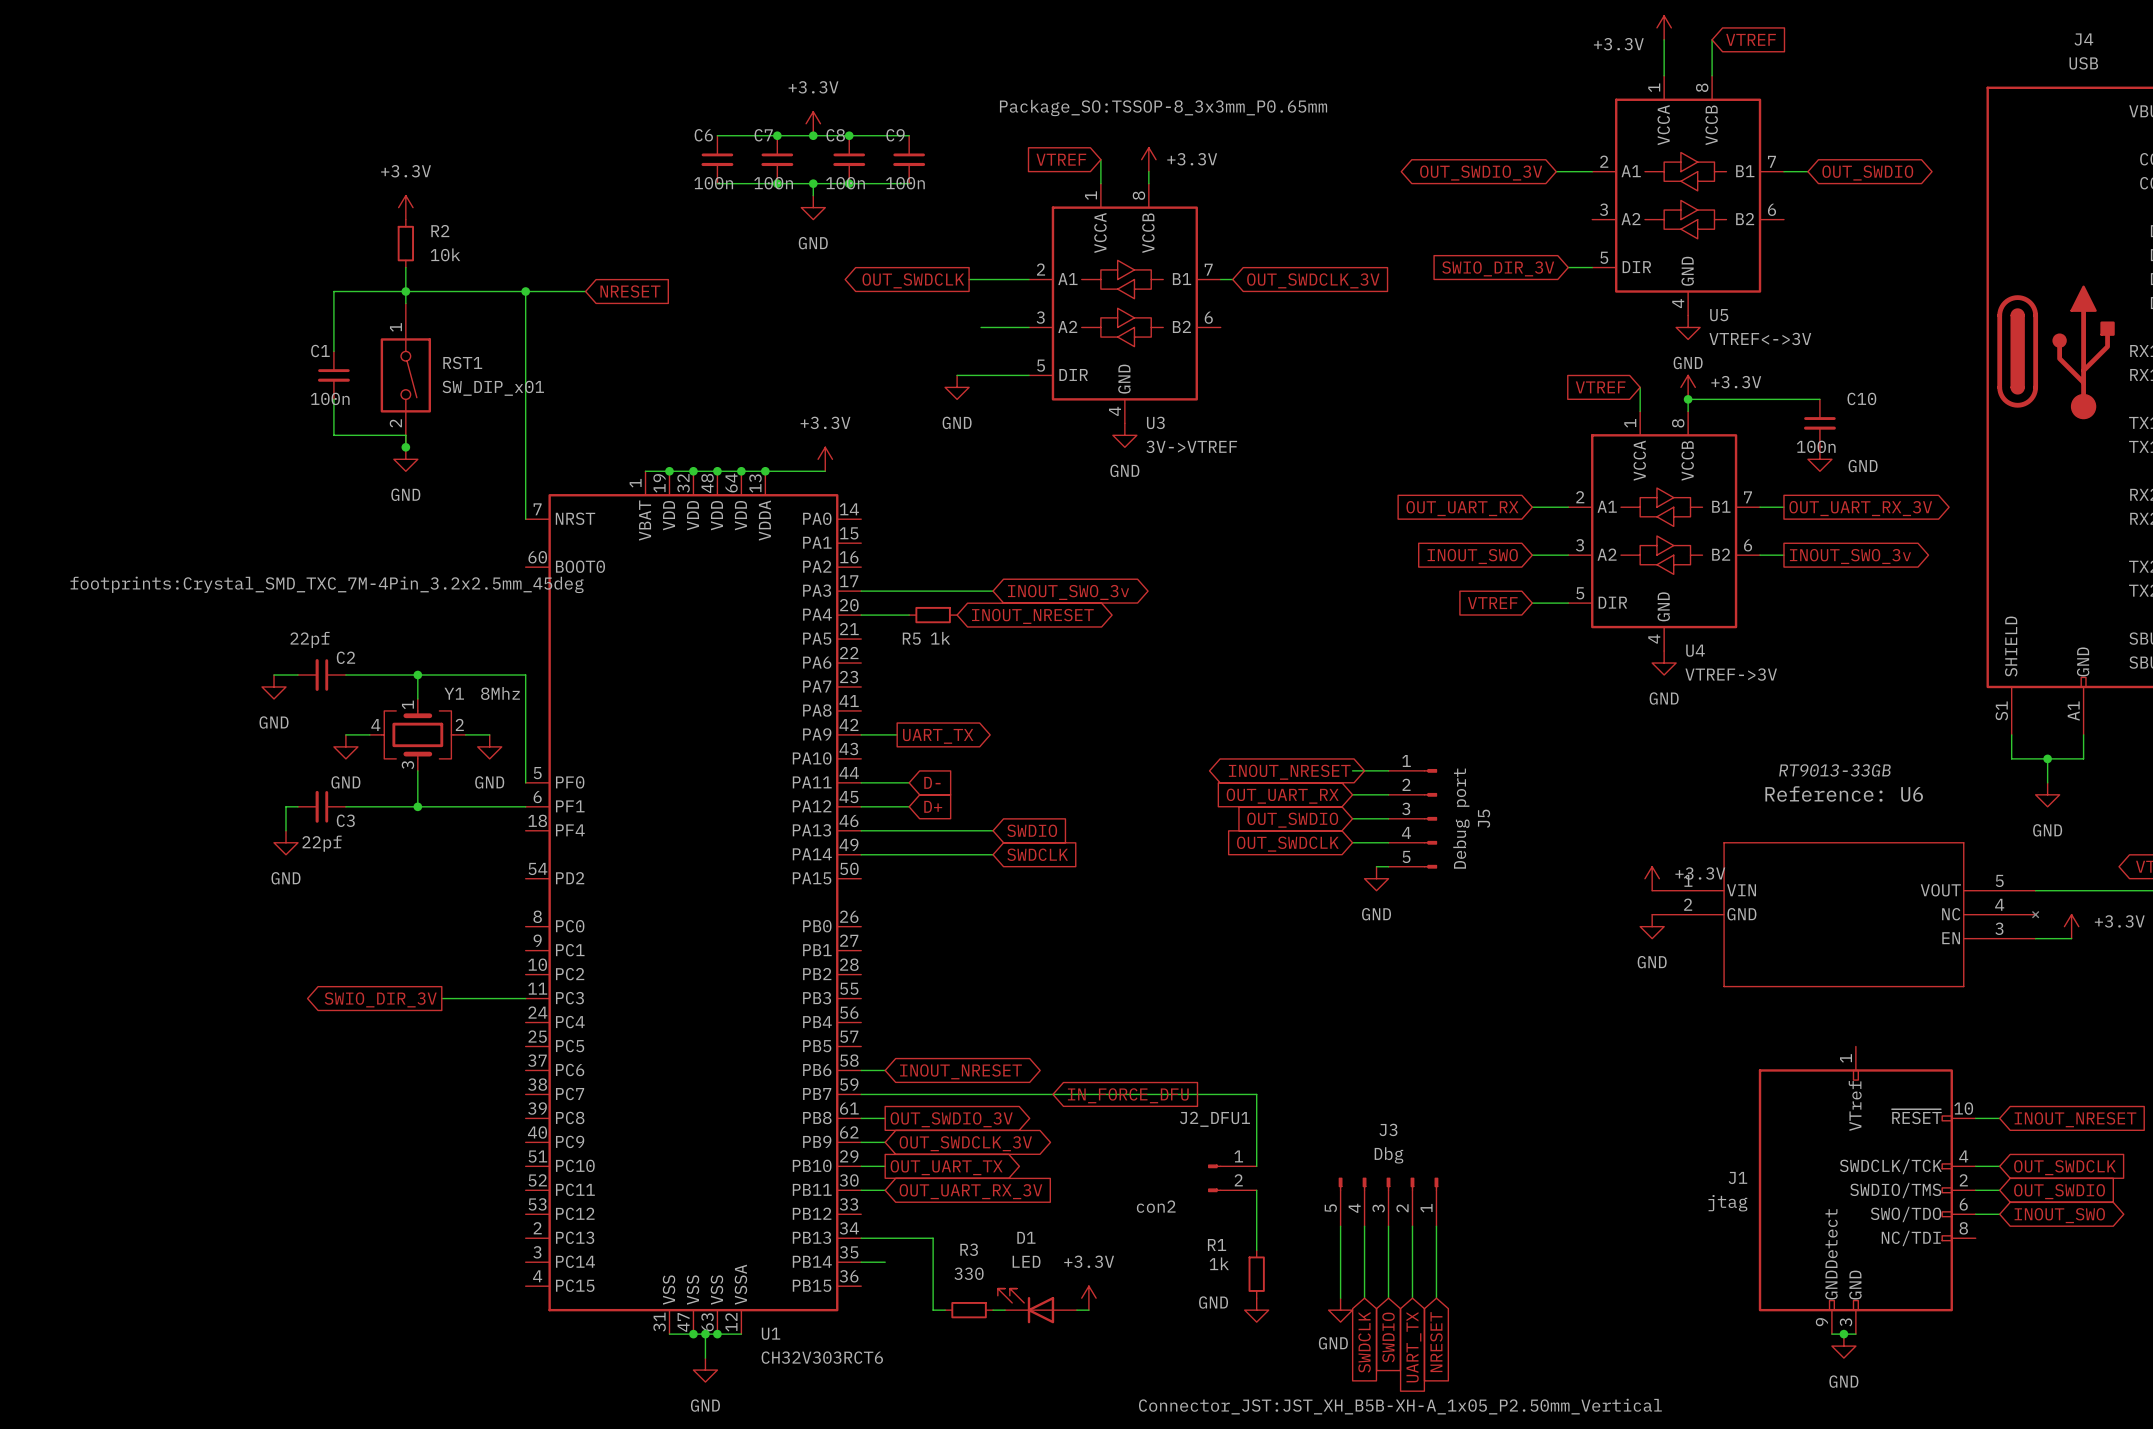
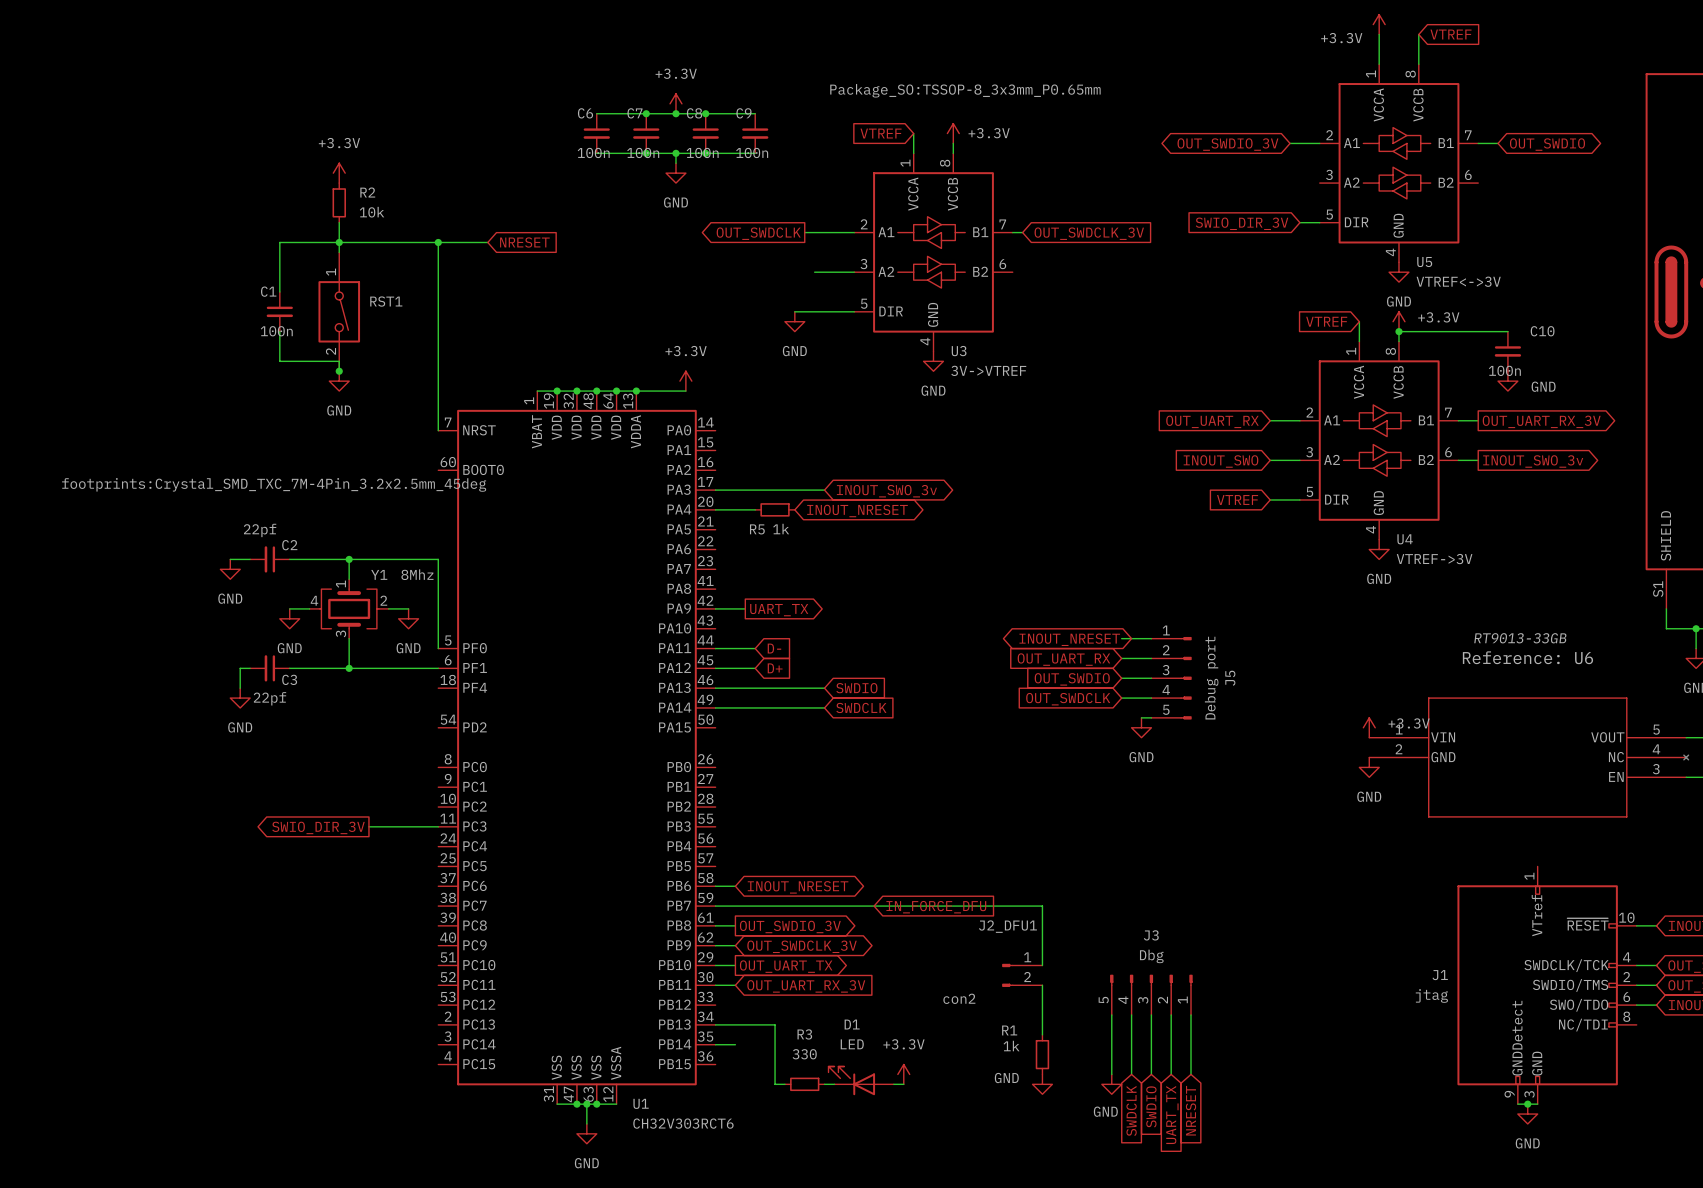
RST1 value: SW_DIP_x01 (493, 388) -> none
J3 text: Connector_JST:JST_XH_B5B-XH-A_1x05_P2.50mm_Vertical (1400, 1406) -> none

